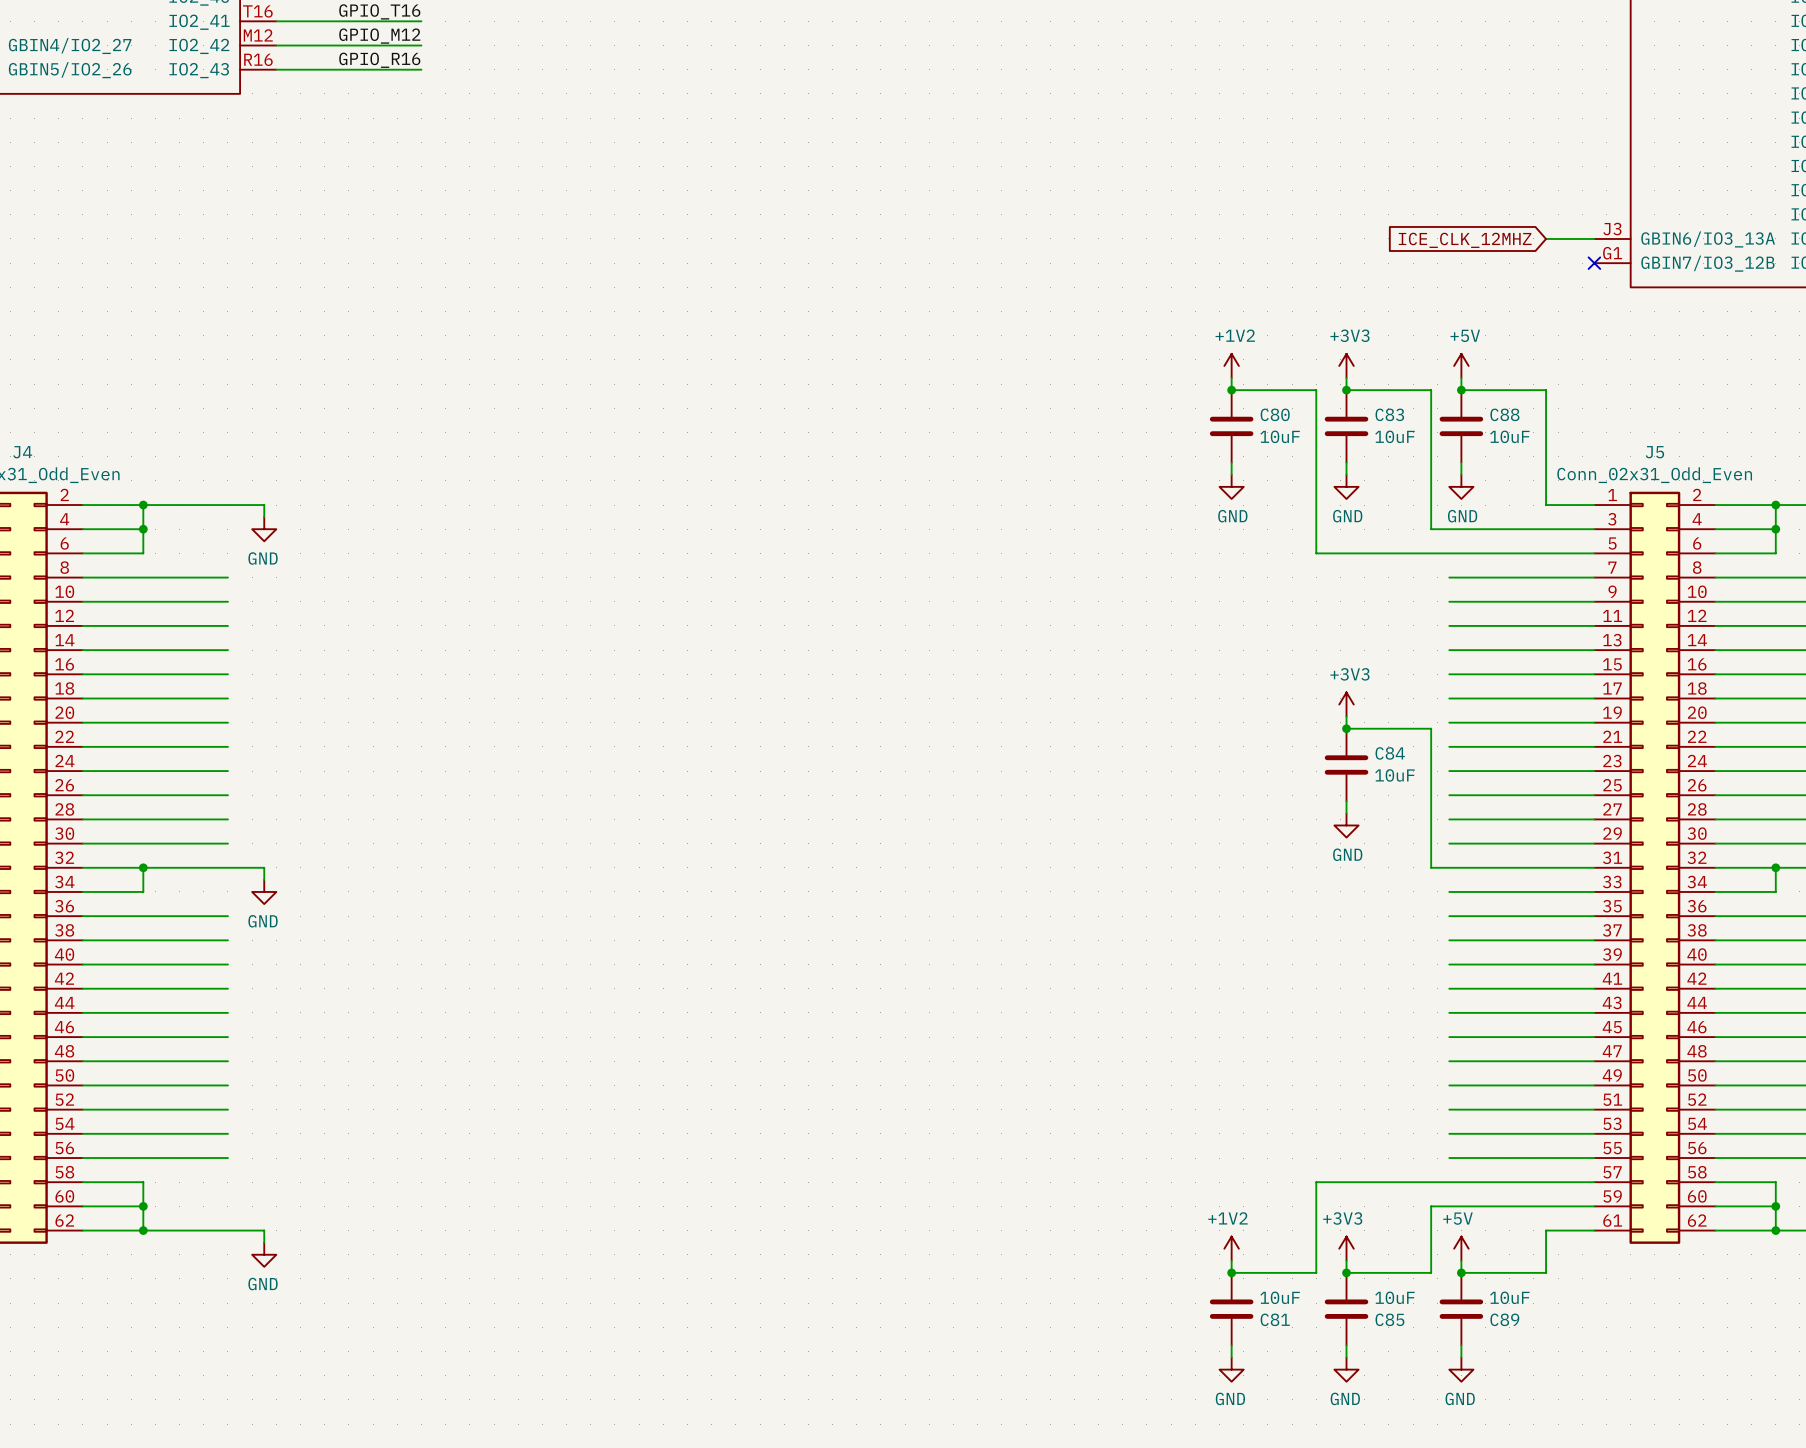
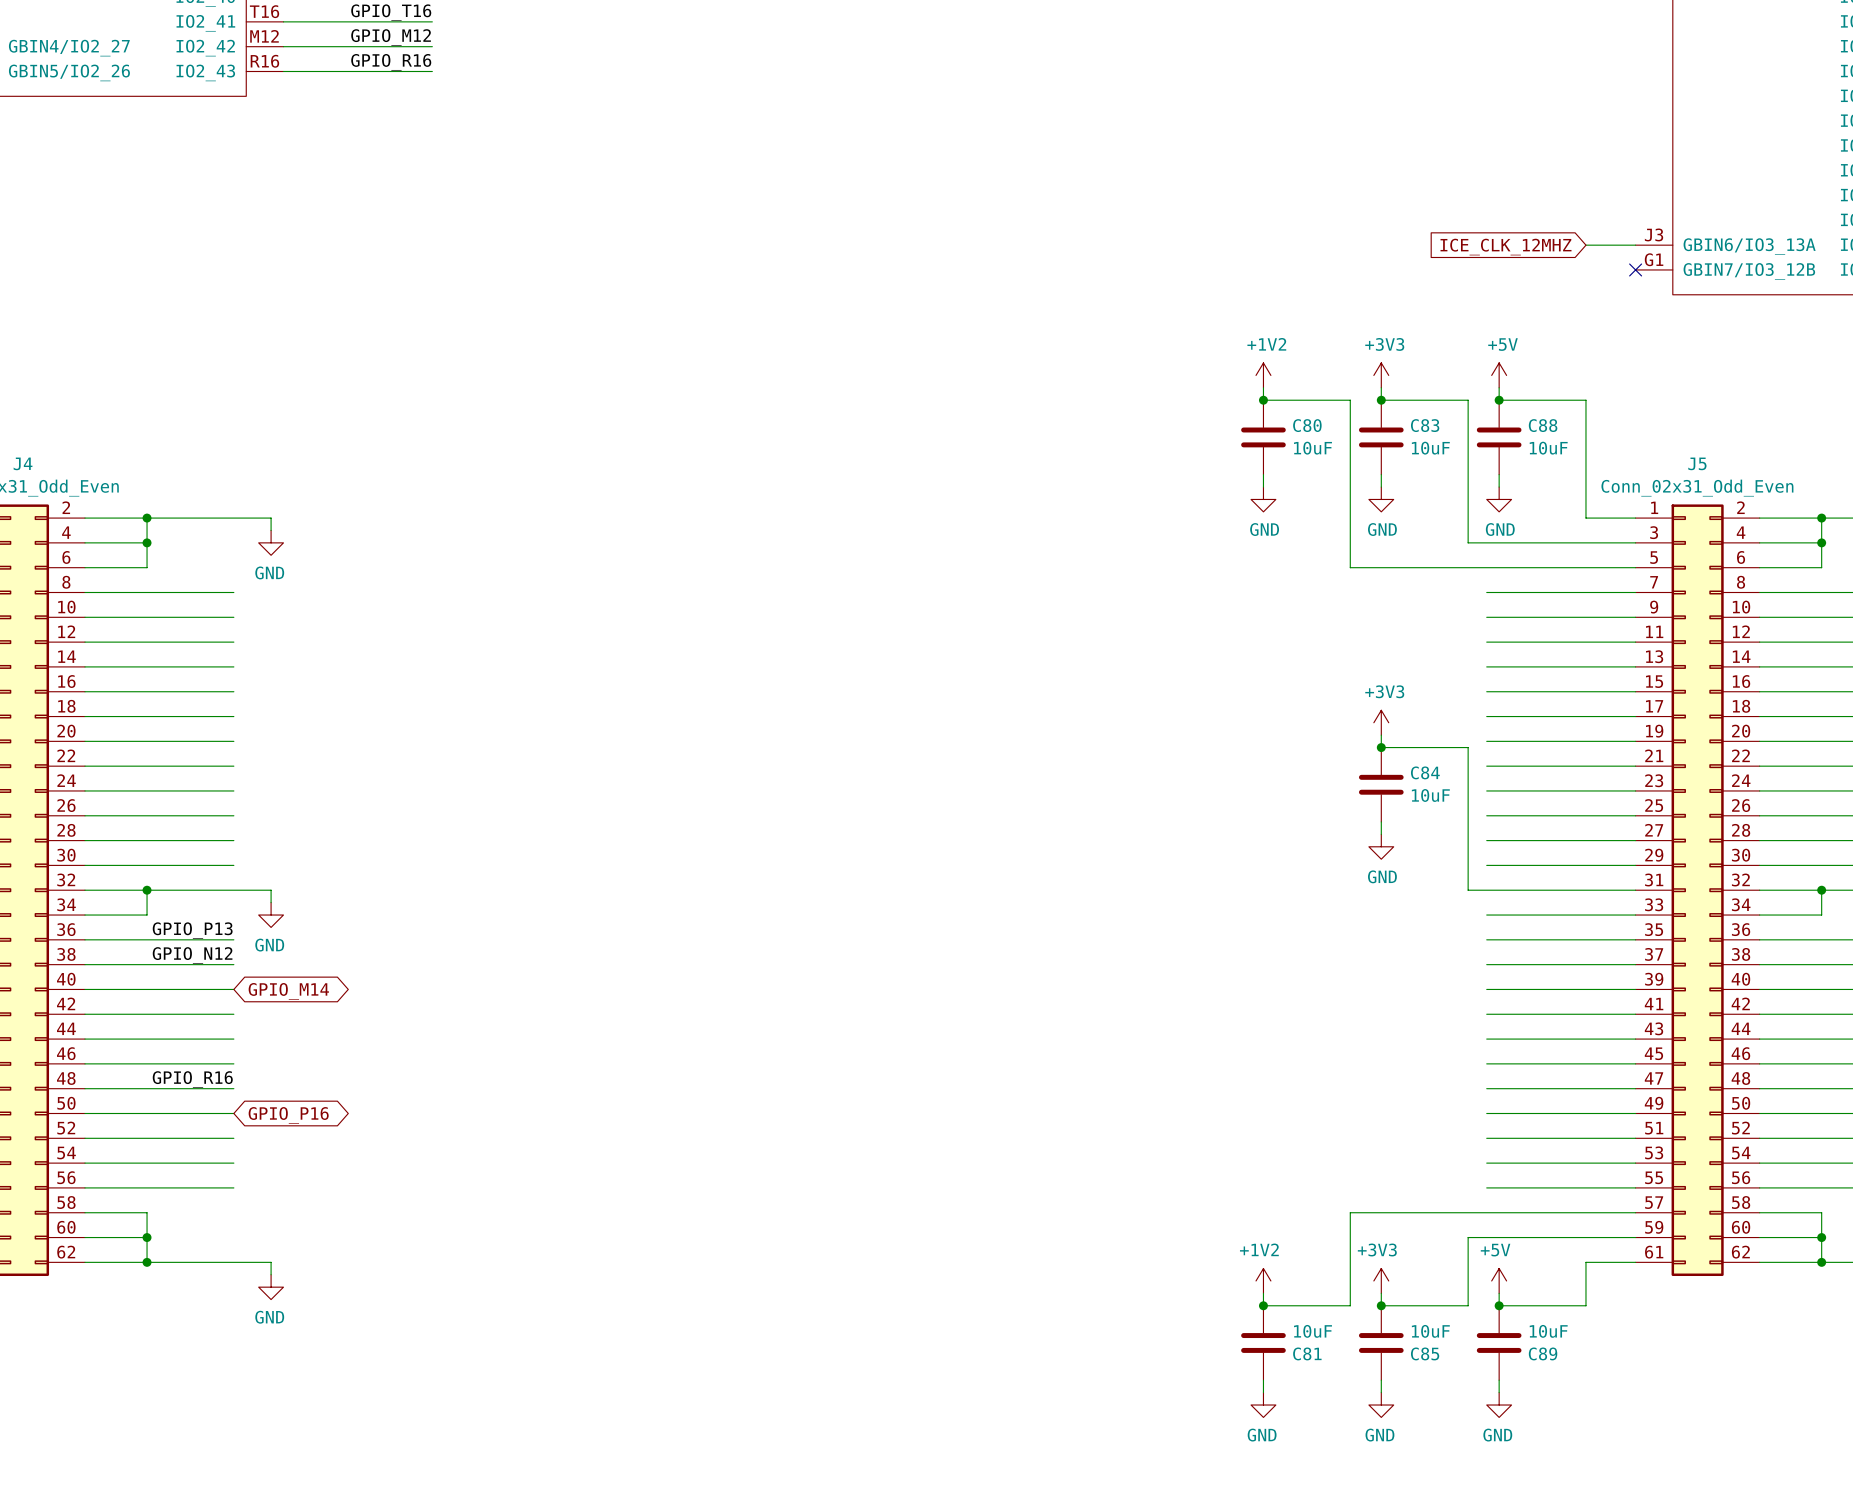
label: none -> GPIO_P13 (192, 930)
label: none -> GPIO_N12 (192, 955)
global label: none -> GPIO_M14 (288, 991)
label: none -> GPIO_R16 (192, 1079)
global label: none -> GPIO_P16 (288, 1115)

